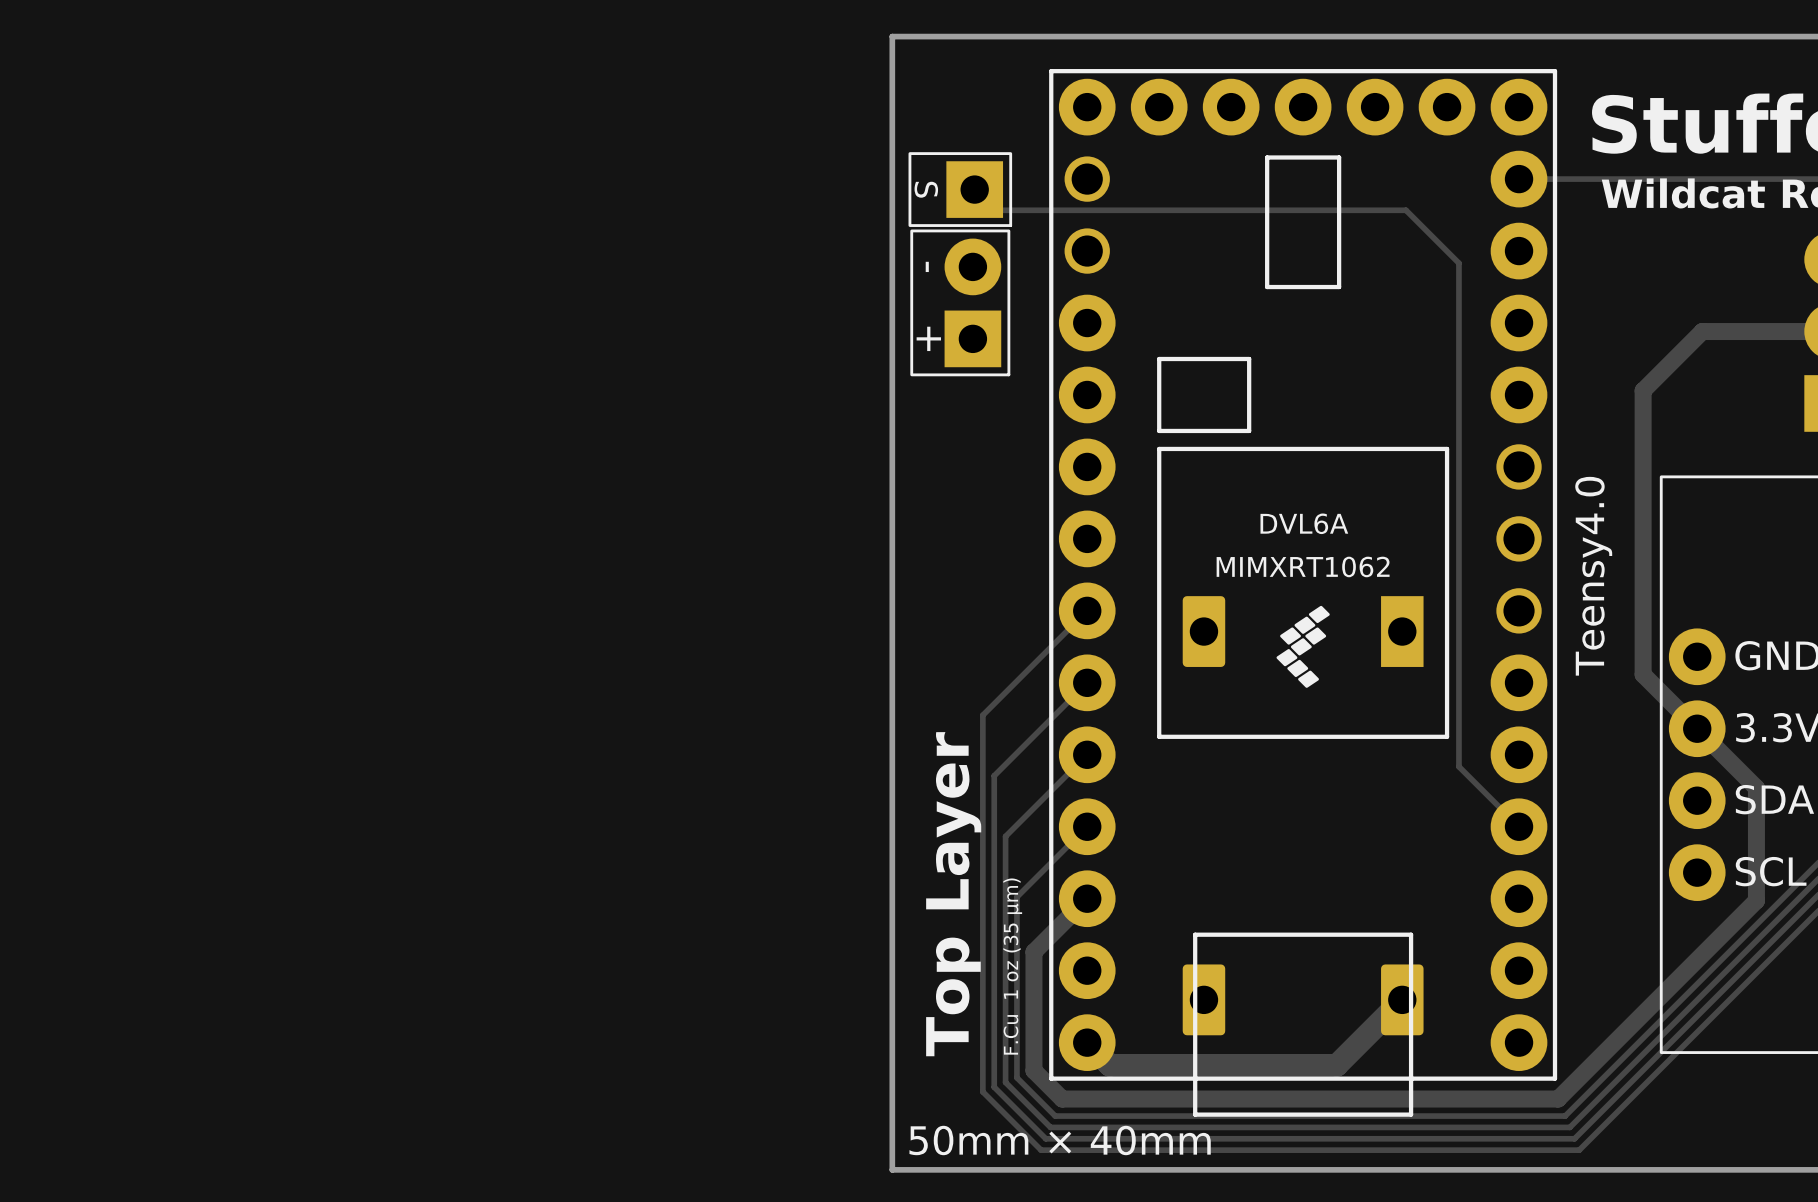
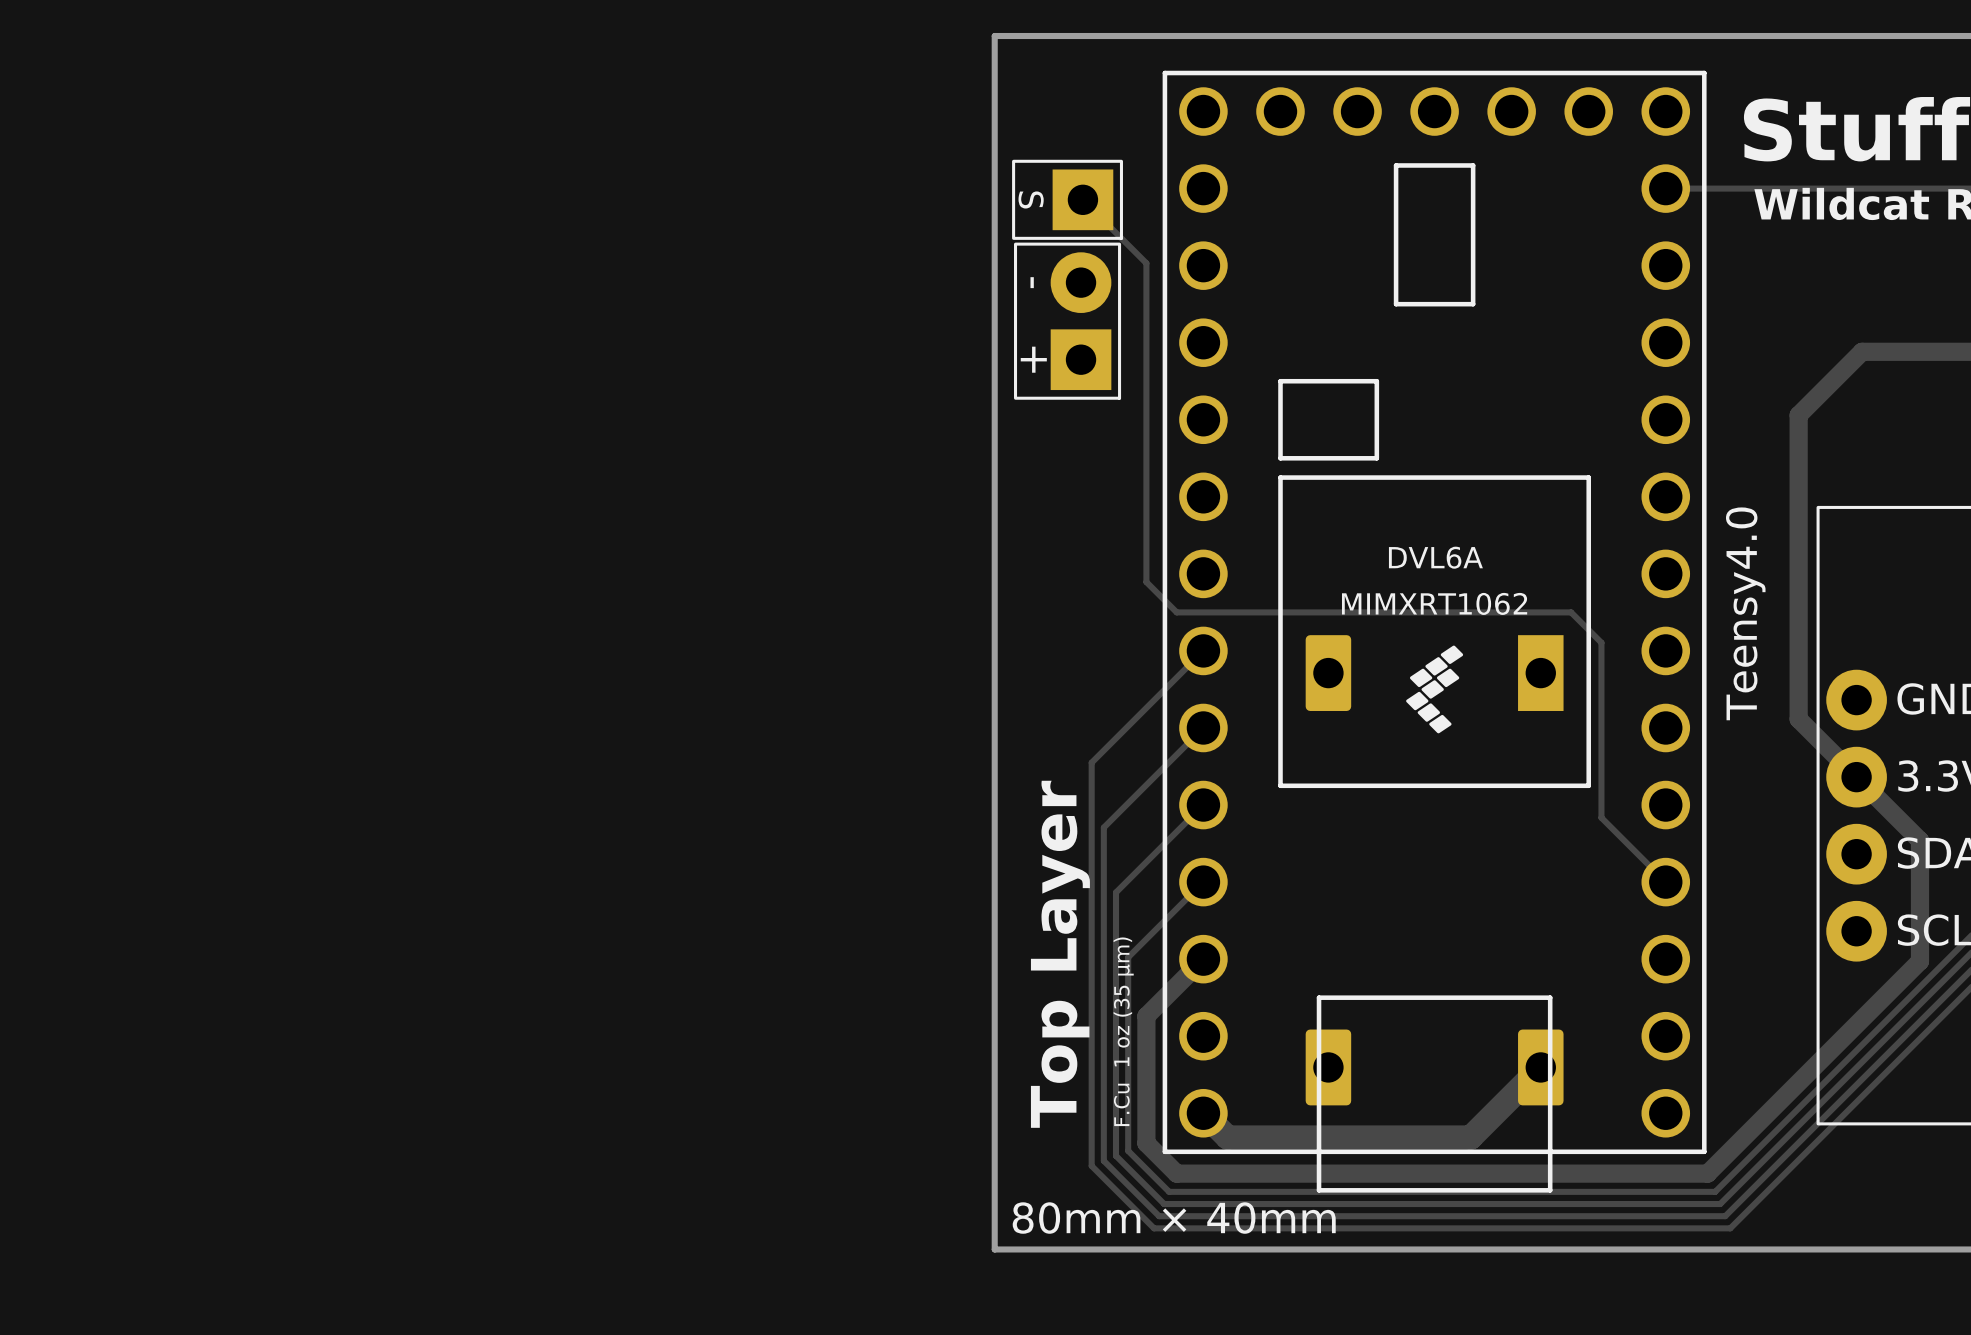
part footprint: [1049, 69, 1558, 1117] -> [1162, 70, 1707, 1193]
track: (995, 210) (1406, 210) (1458, 263) (1458, 603) -> (1105, 222) (1146, 263) (1146, 582) (1176, 612) (1571, 612) (1601, 642)
text: 50mm × 40mm (1060, 1140) -> 80mm × 40mm (1174, 1218)

